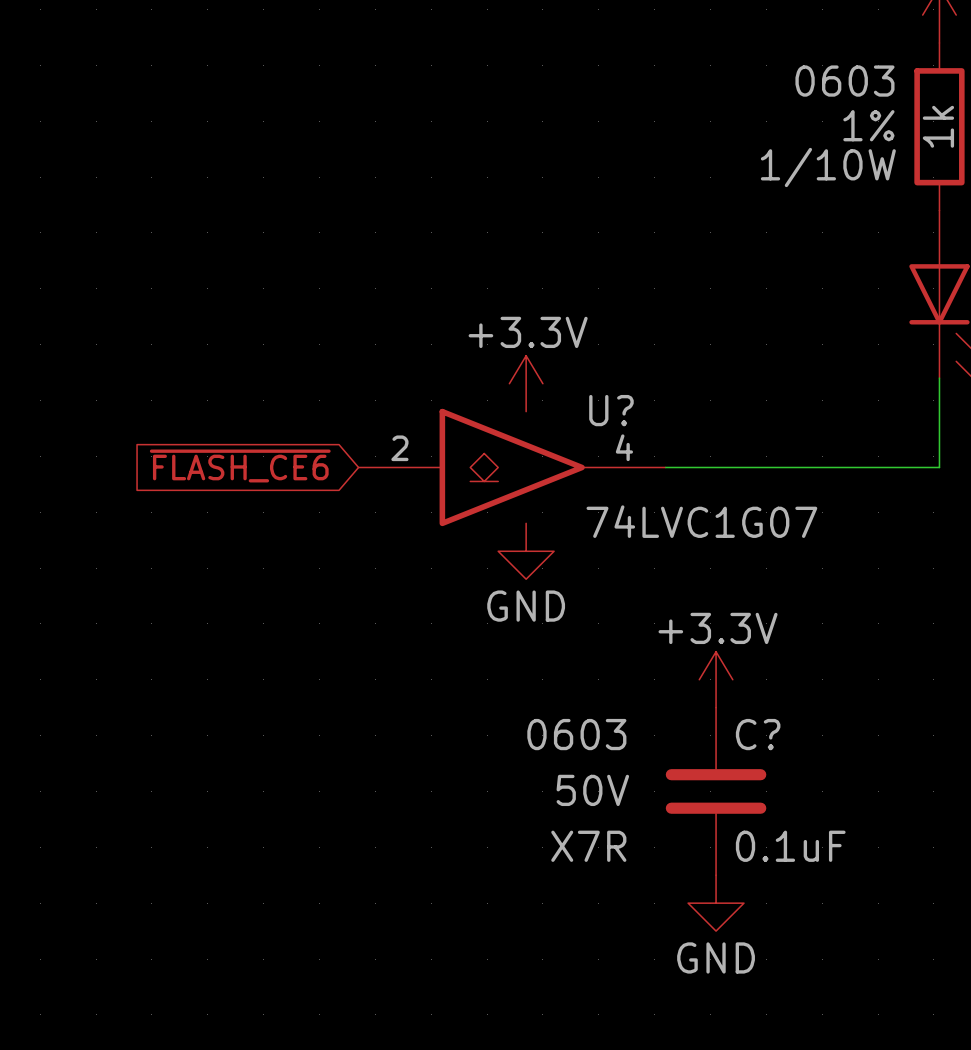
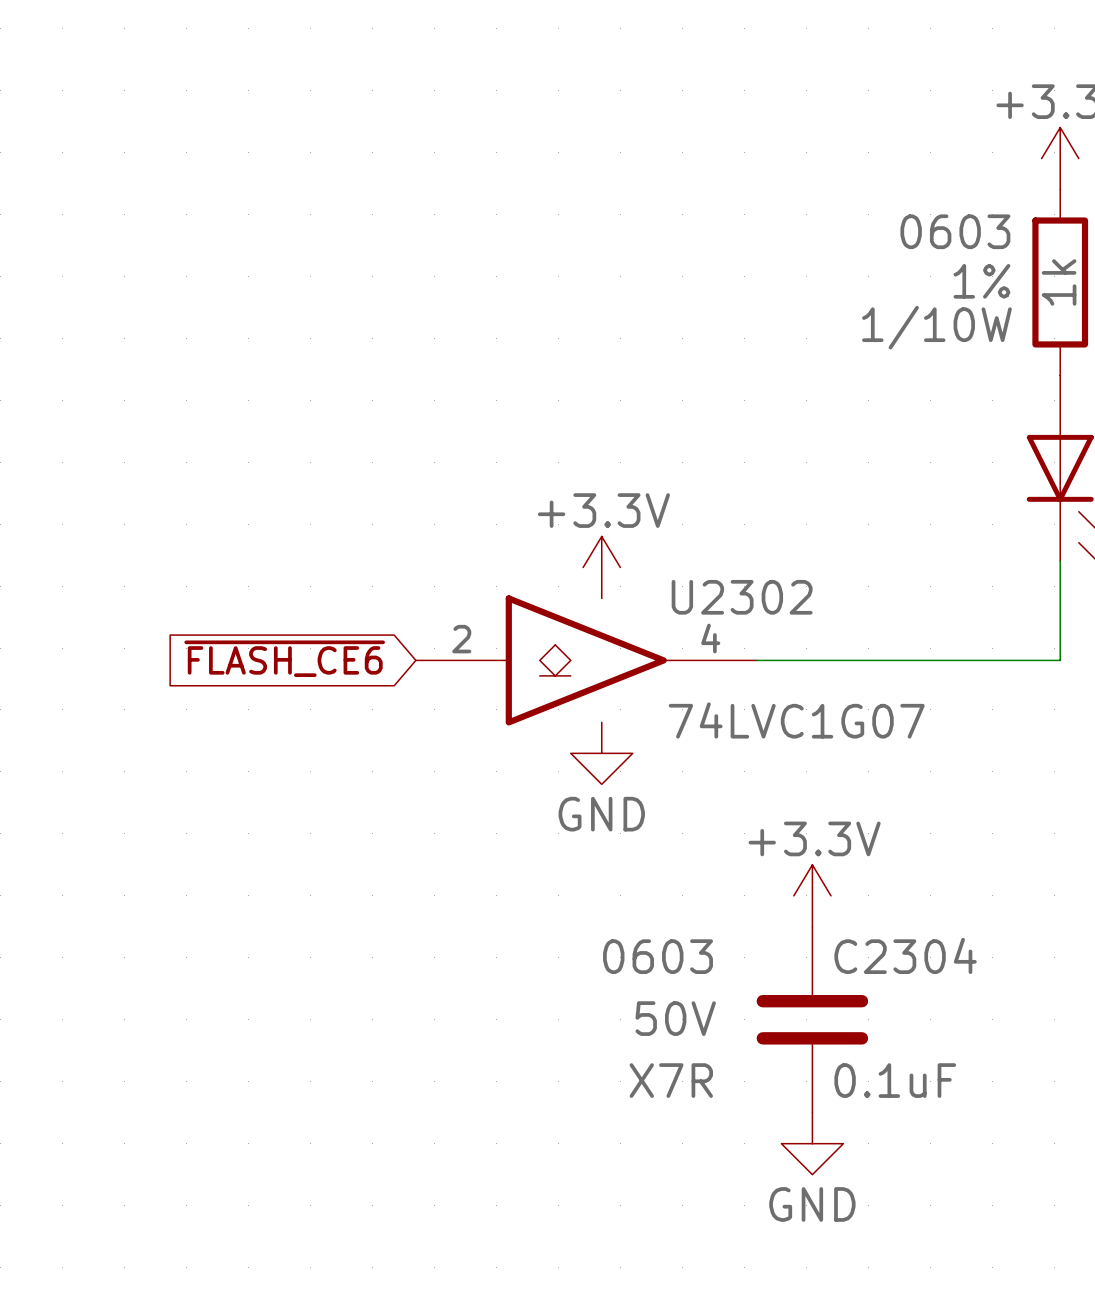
U? name: U? (611, 410) -> U2302 (742, 597)
C? name: C? (758, 734) -> C2304 (905, 955)

